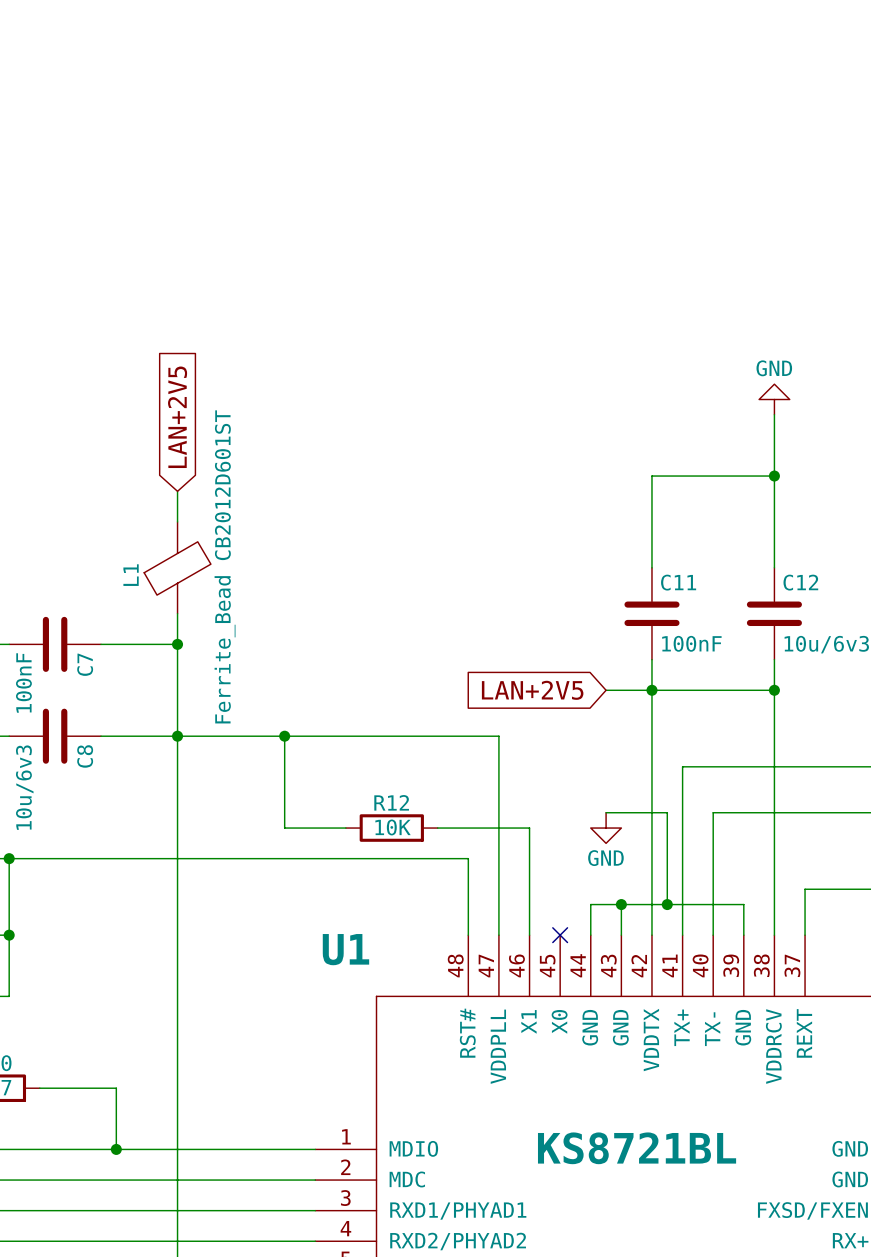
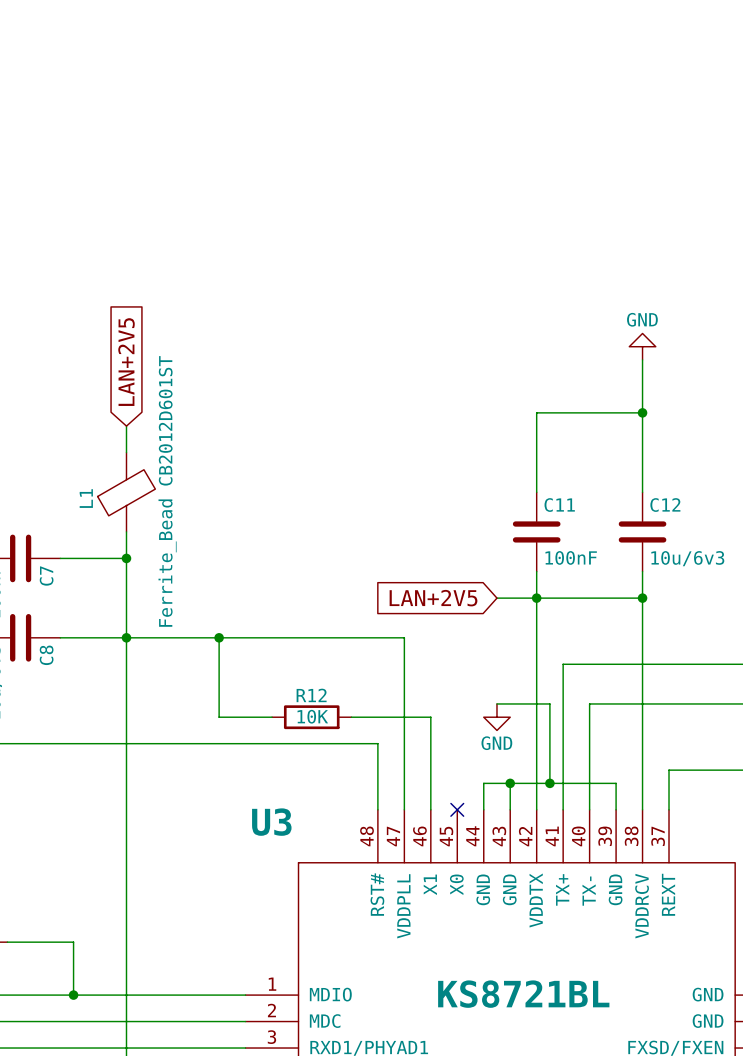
U1 name: U1 (345, 949) -> U3 (271, 822)

